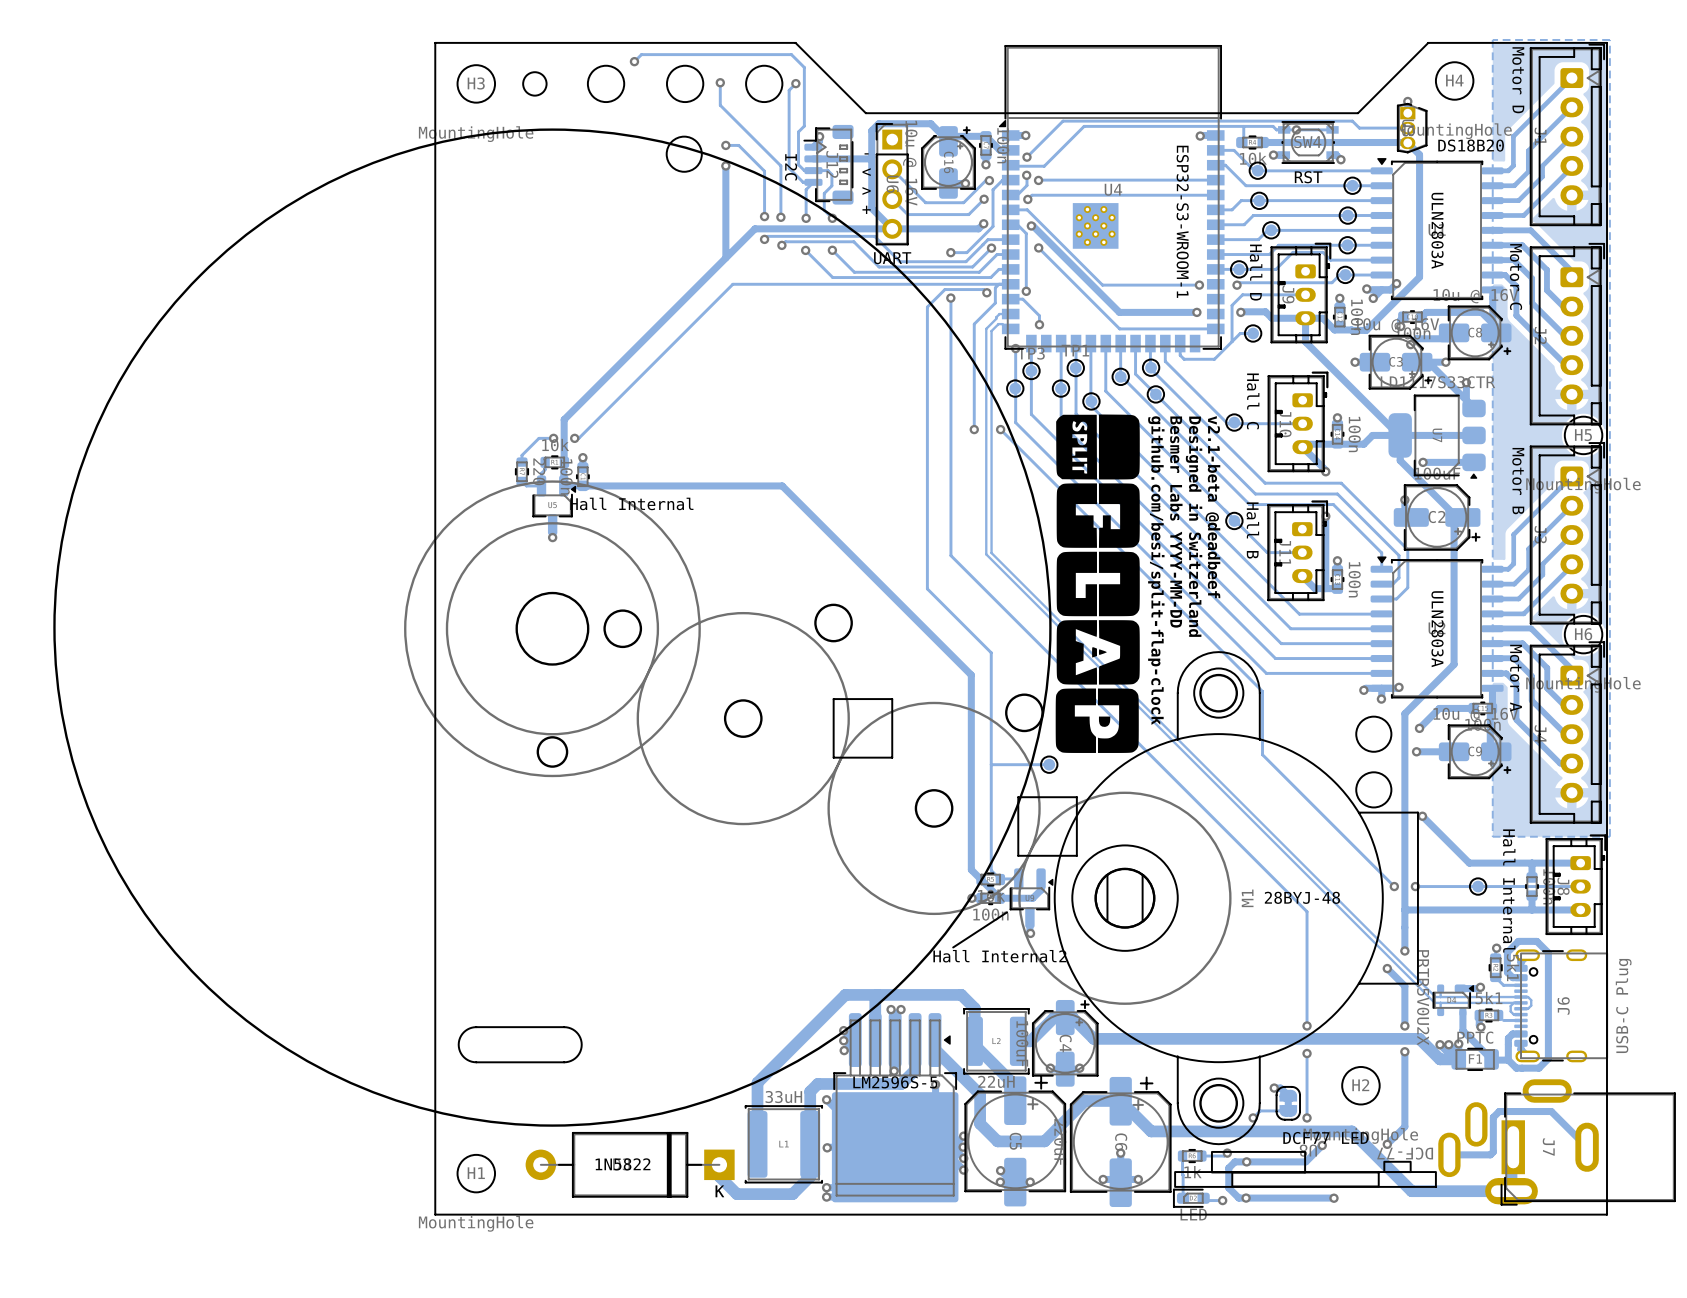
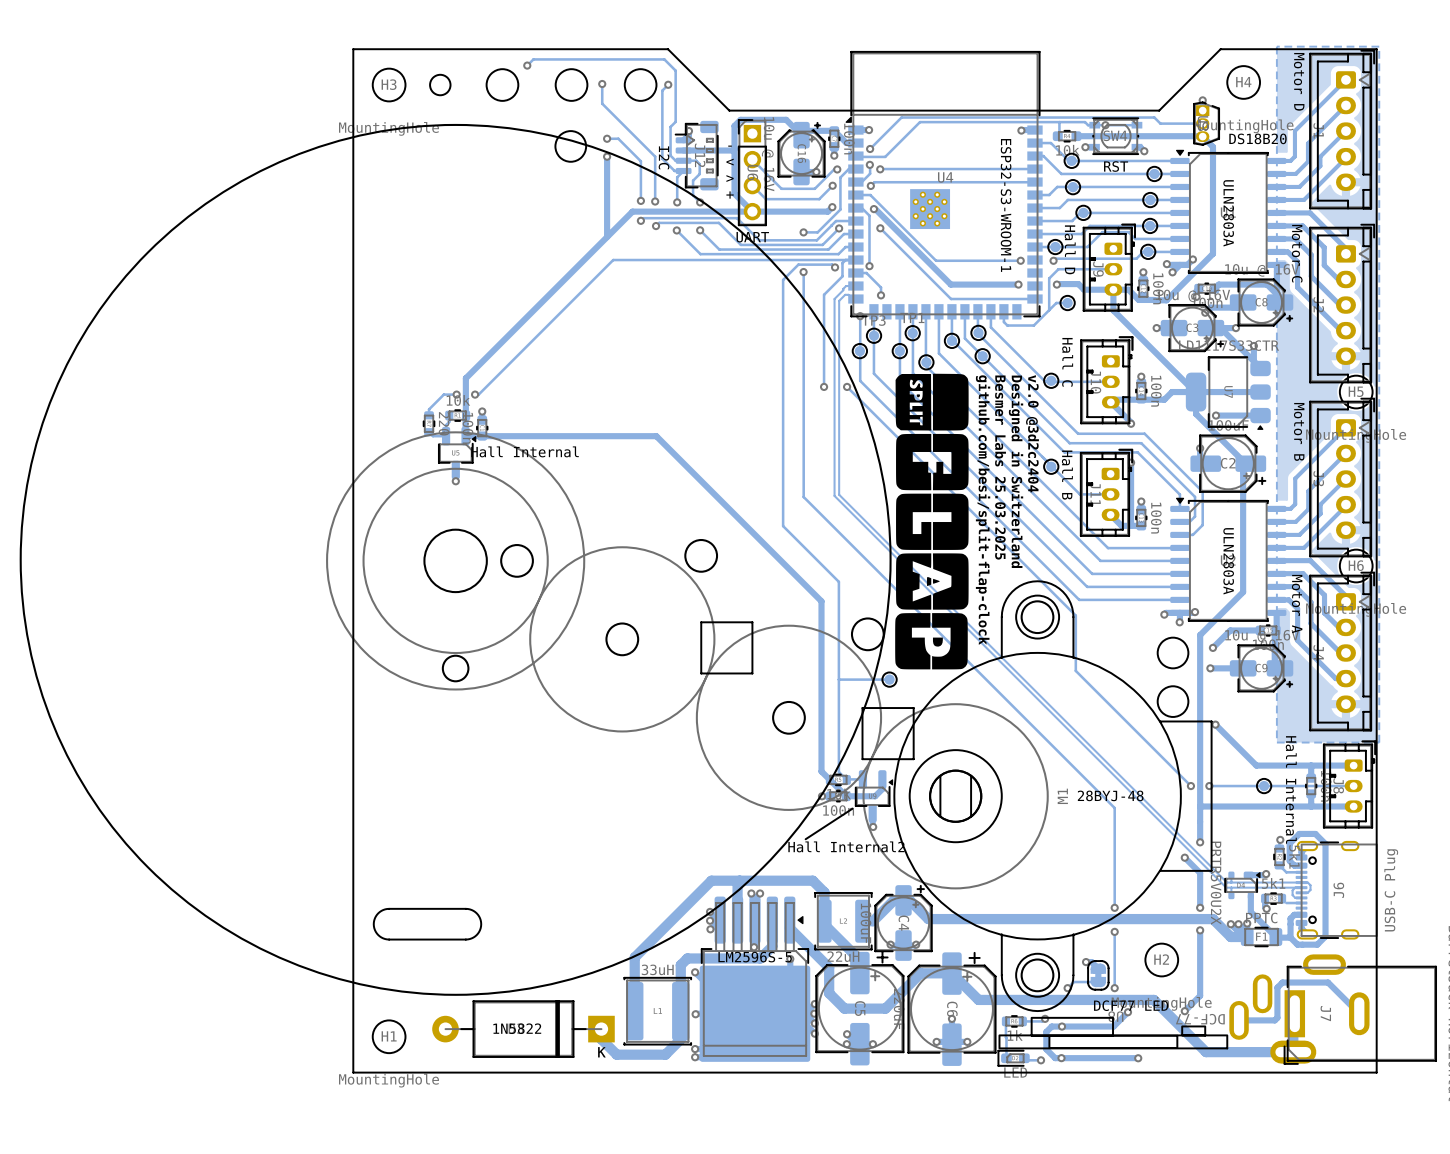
text: v2.1-beta @deadbeef (1212, 507) -> v2.0 @3d2c2404 (1032, 433)
text: Besmer Labs YYYY-MM-DD (1176, 522) -> Besmer Labs 25.03.2025 (1000, 467)

